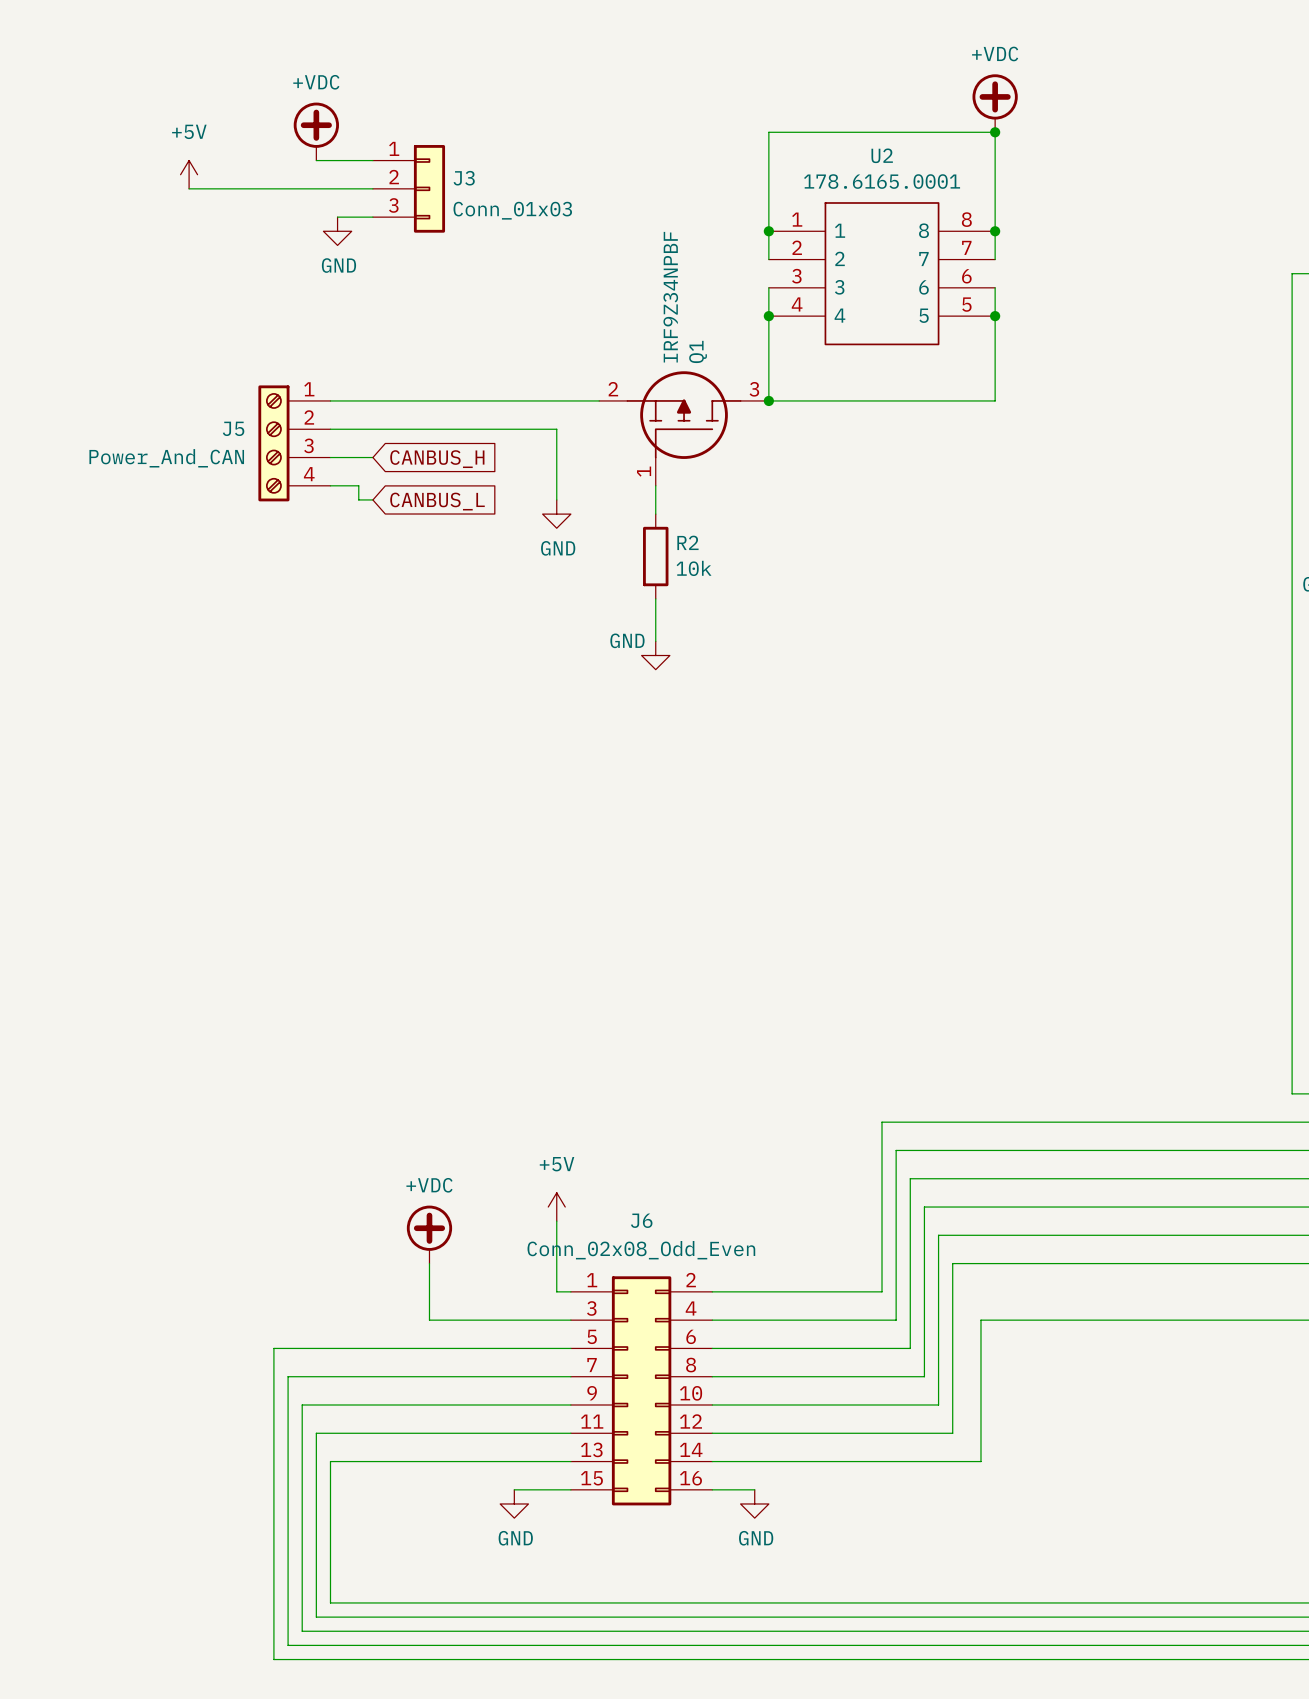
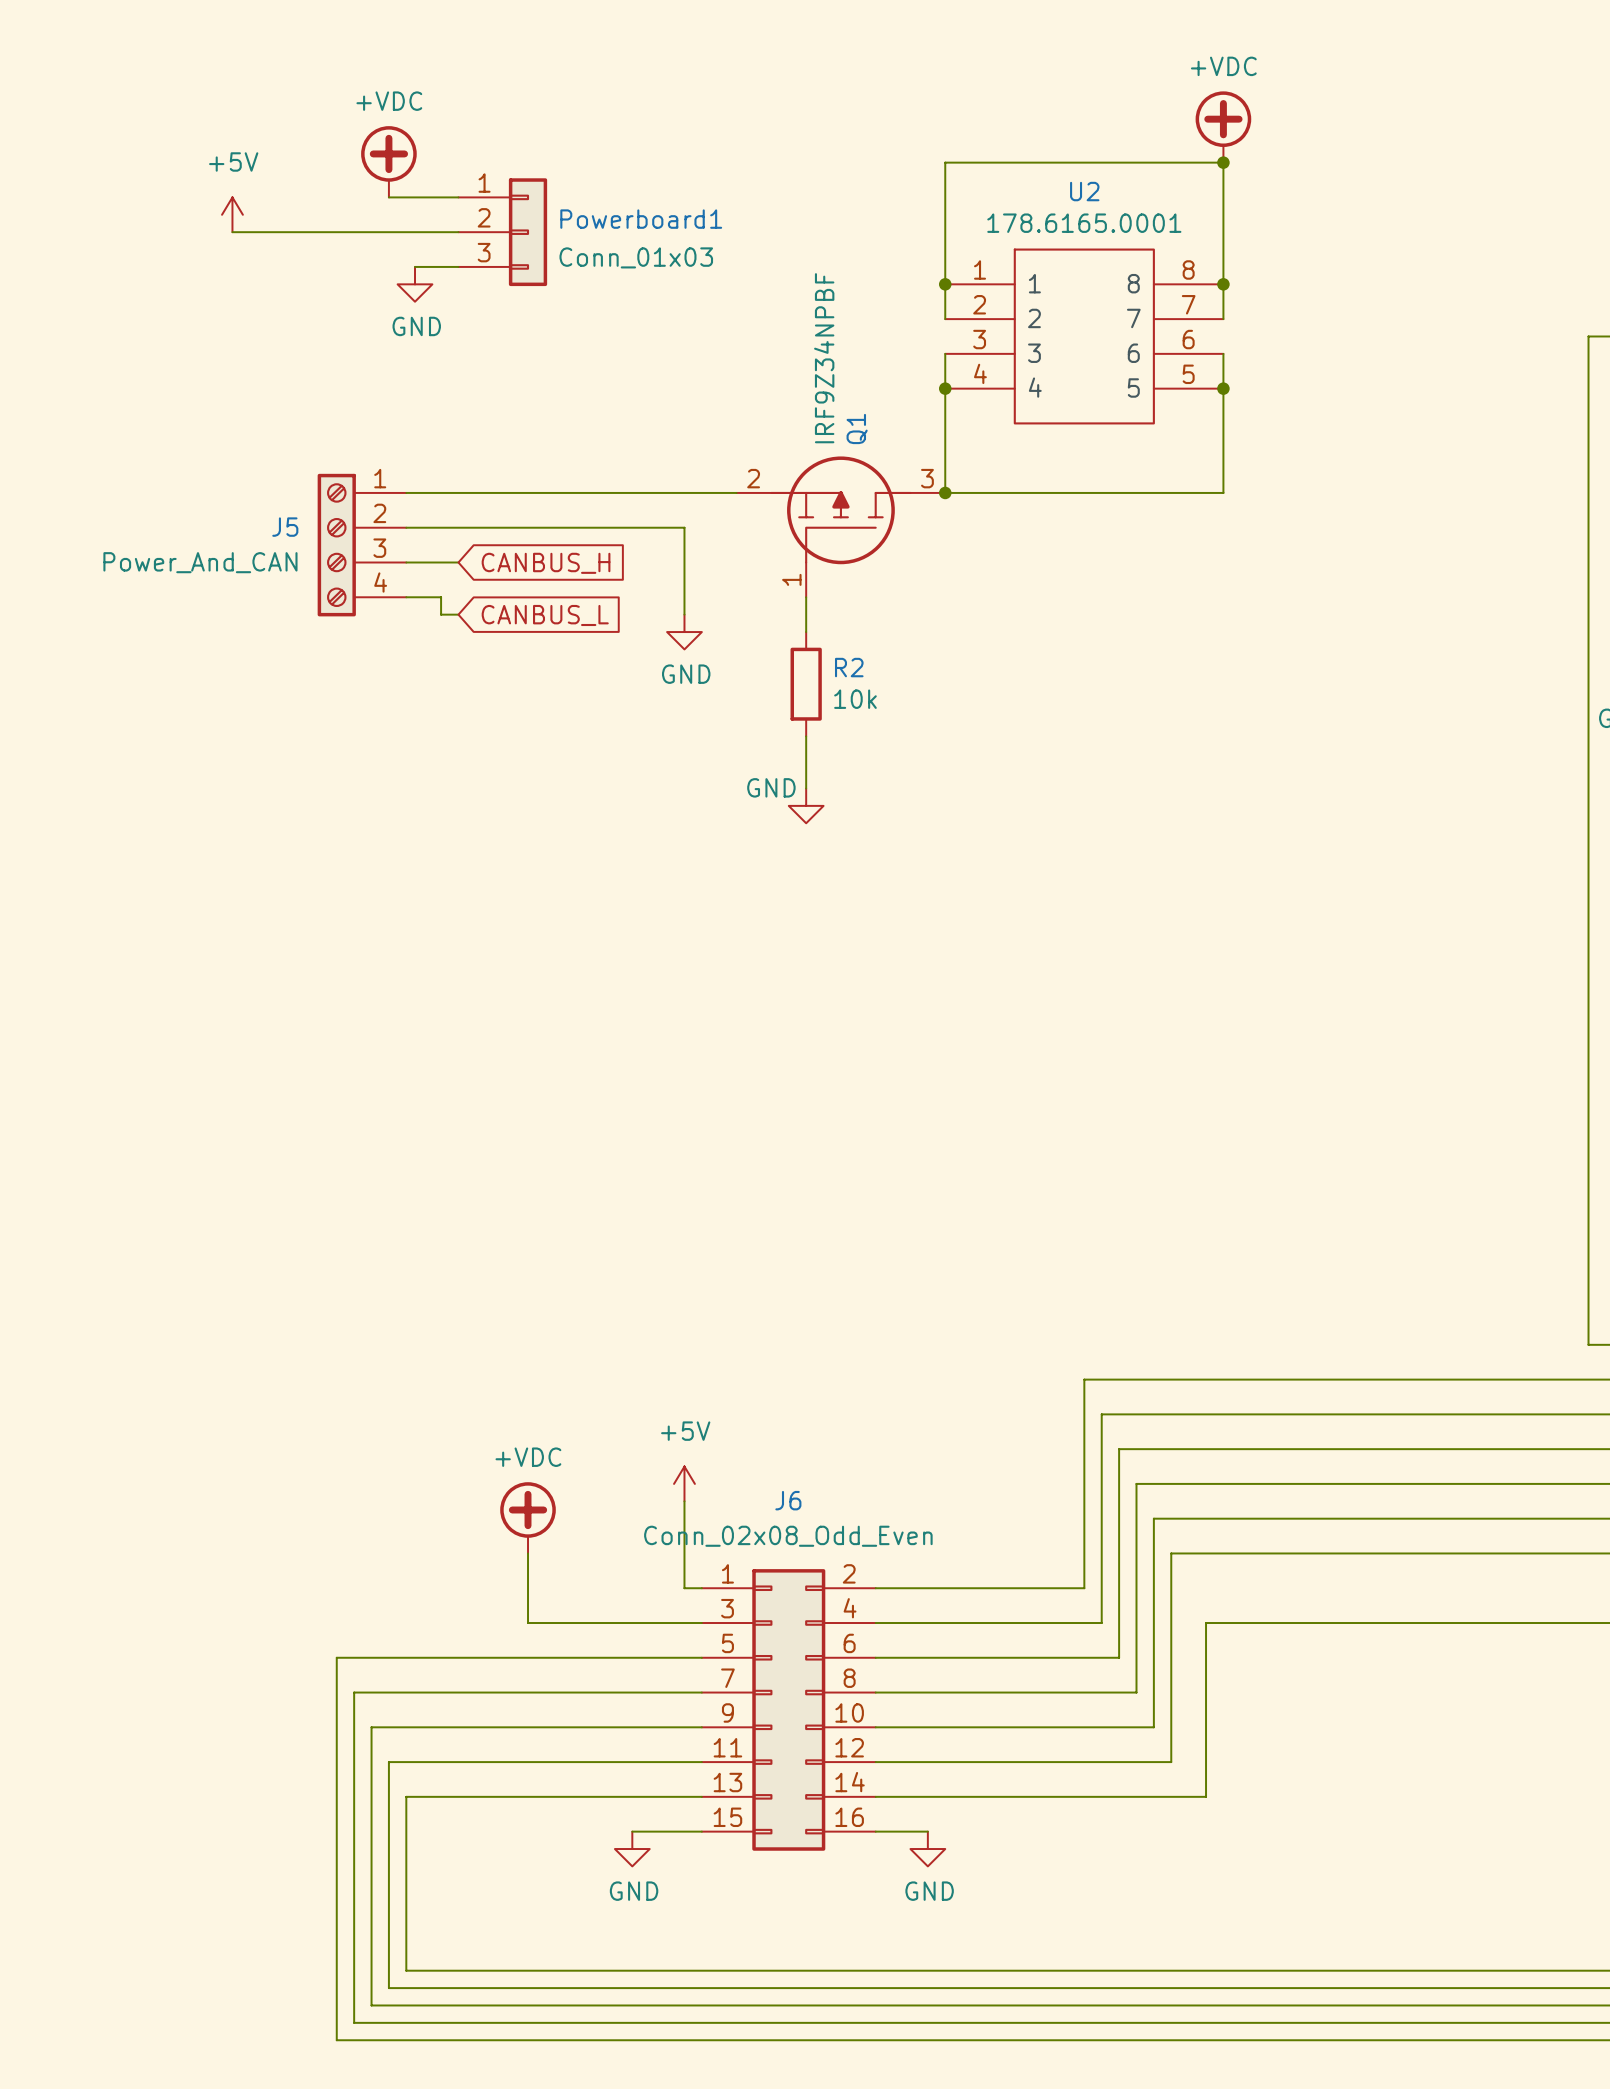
J3 name: J3 (464, 178) -> Powerboard1 (641, 219)

